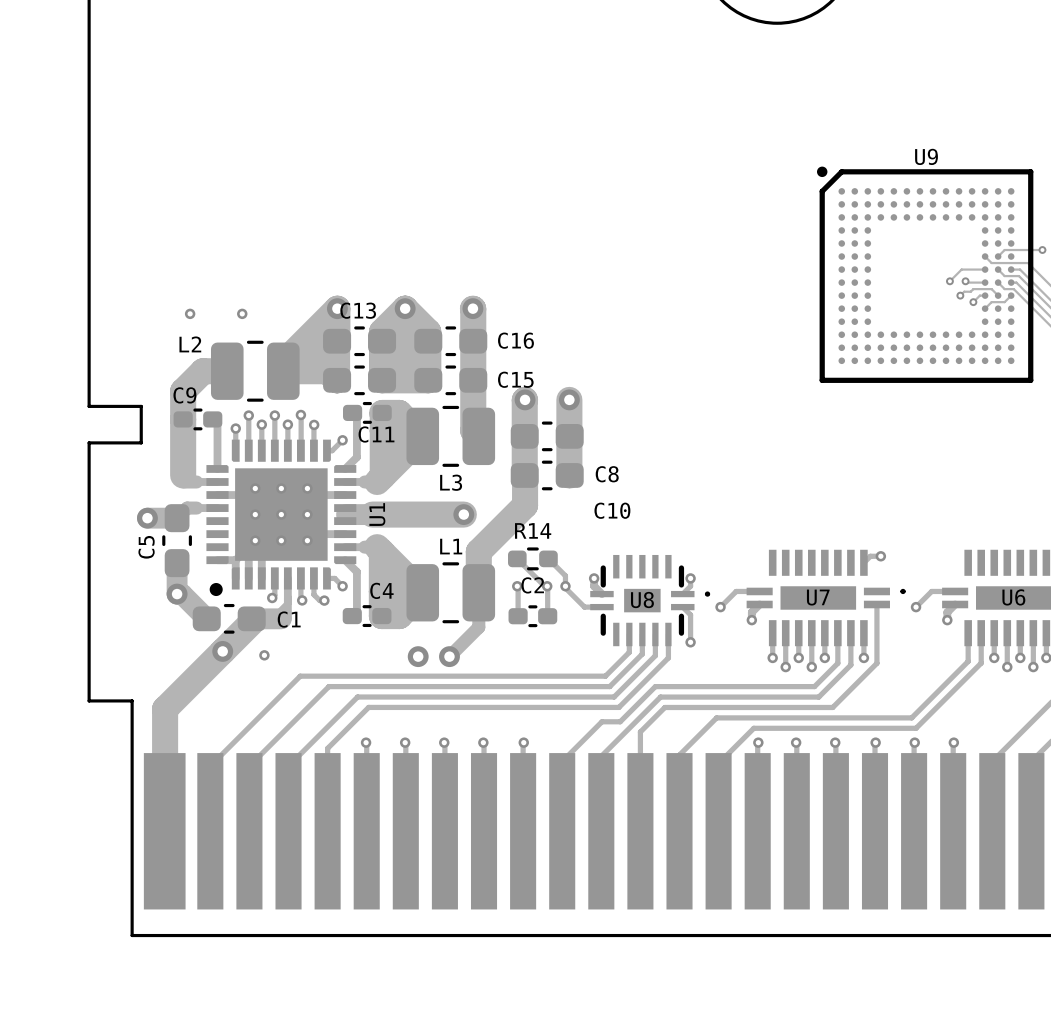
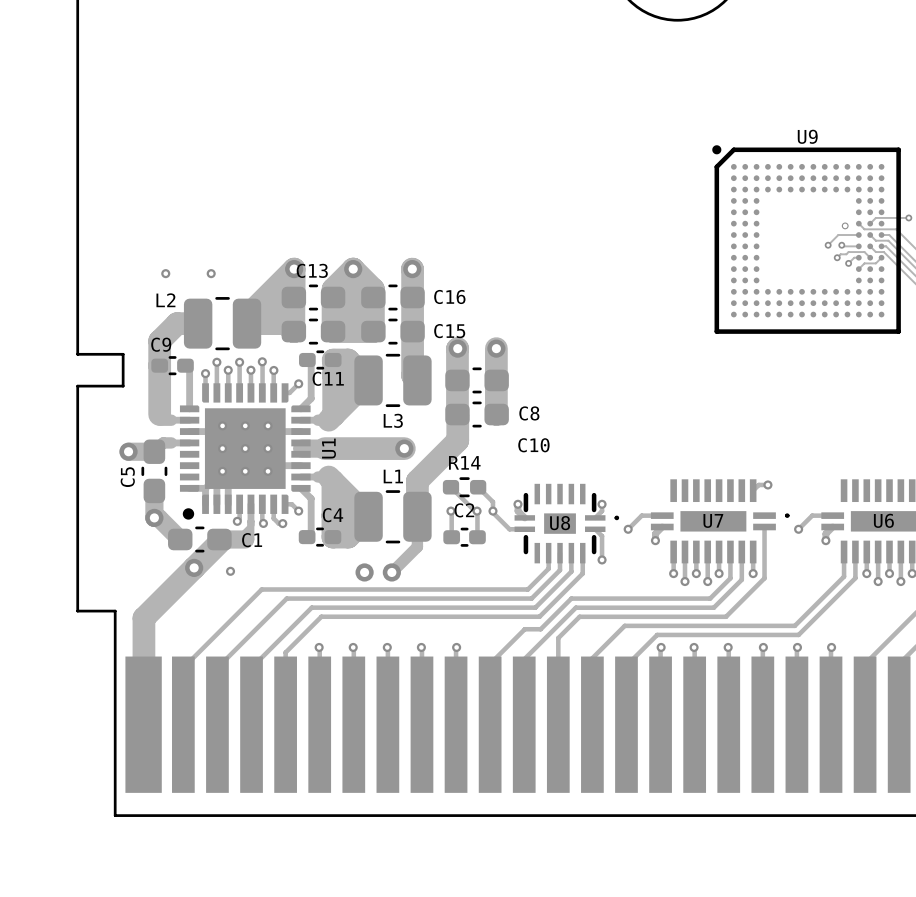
via: none -> (845, 225)

